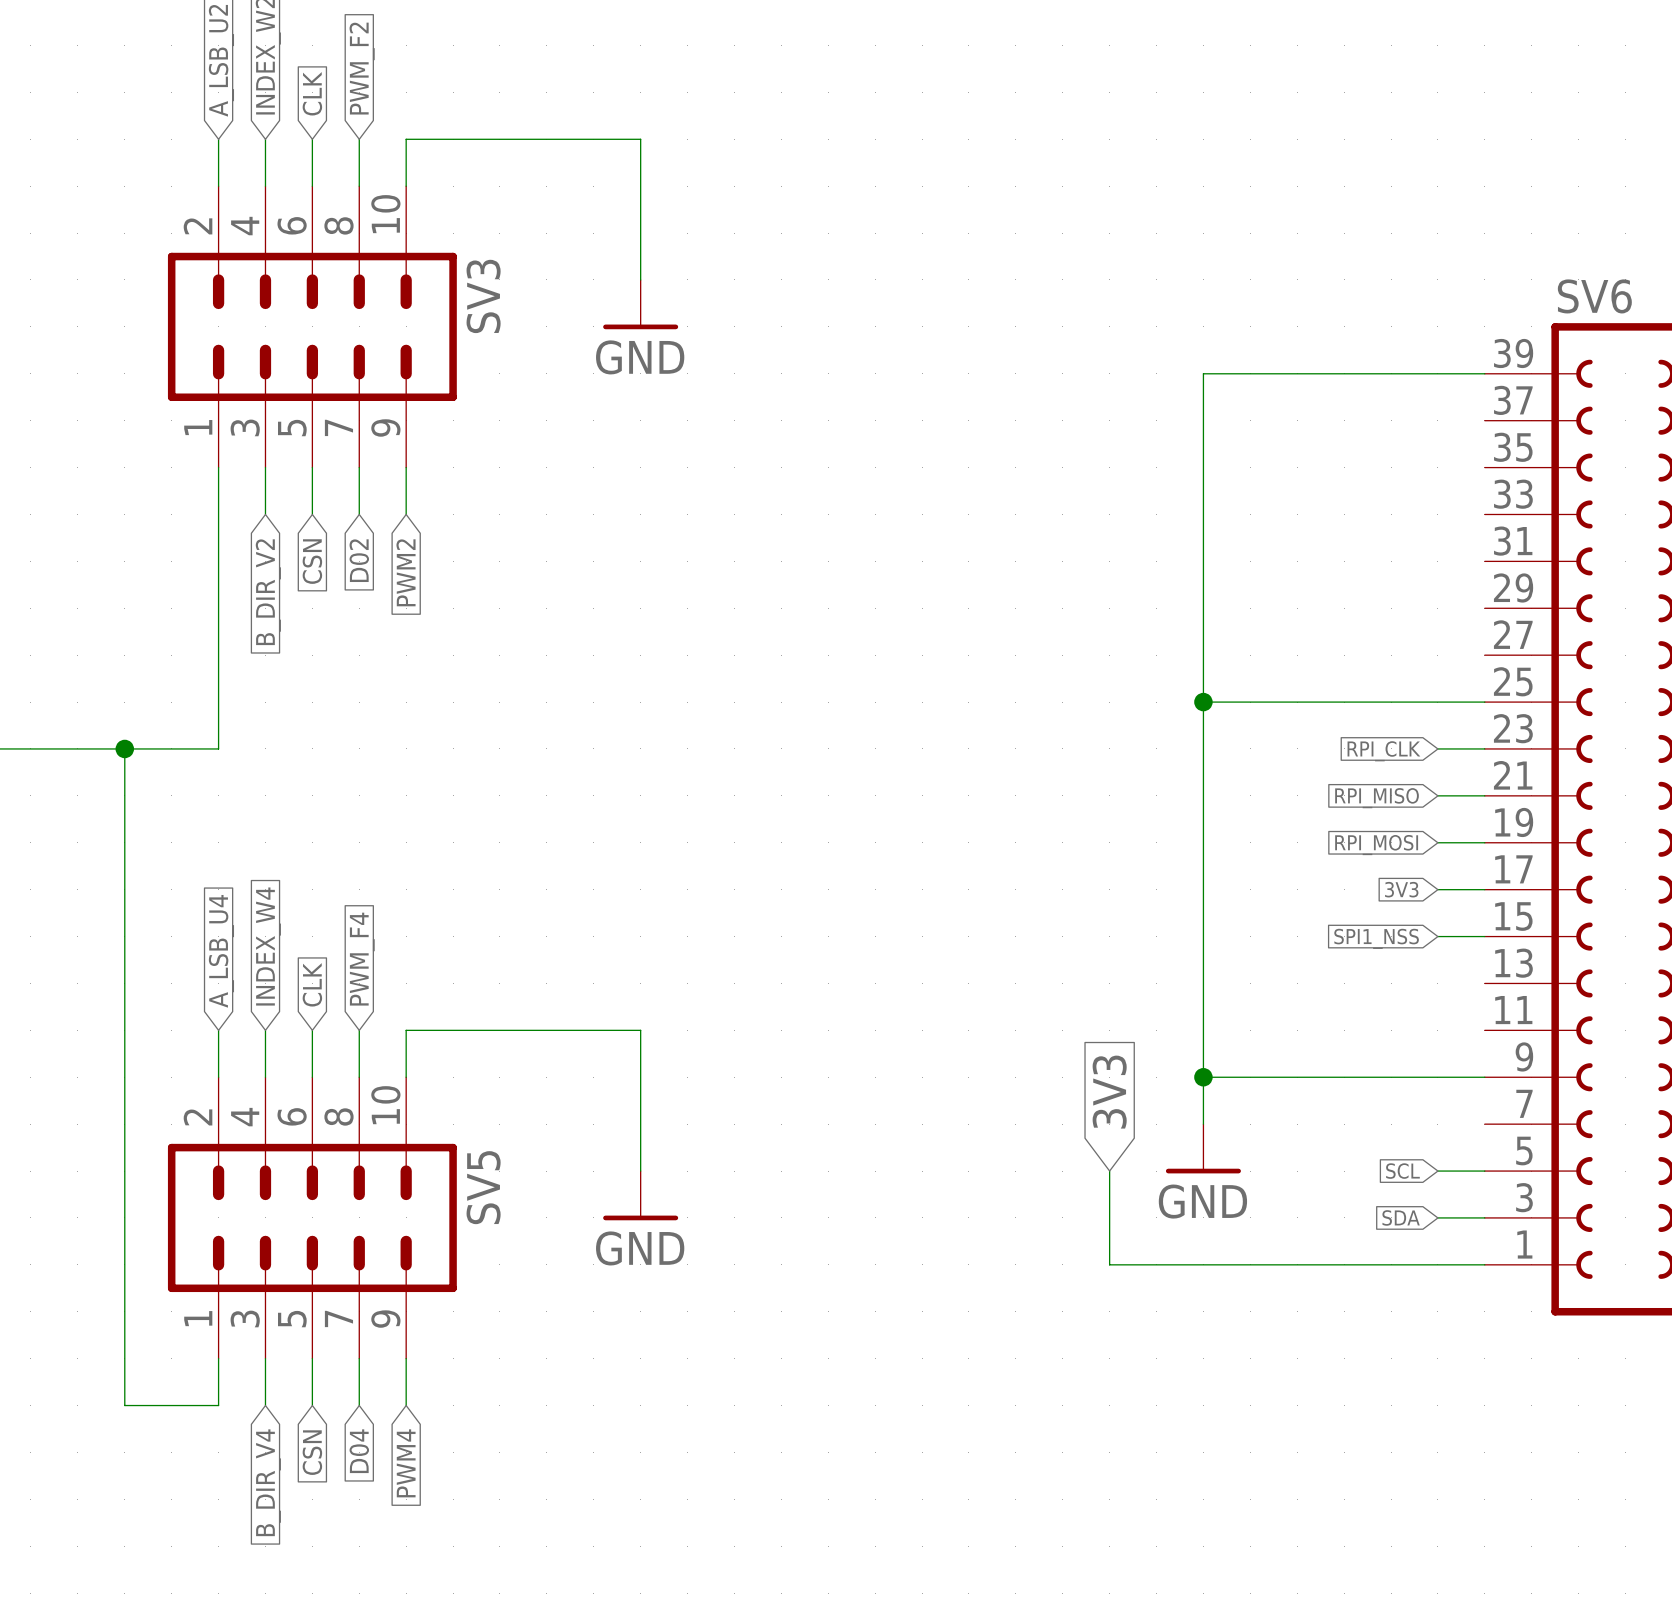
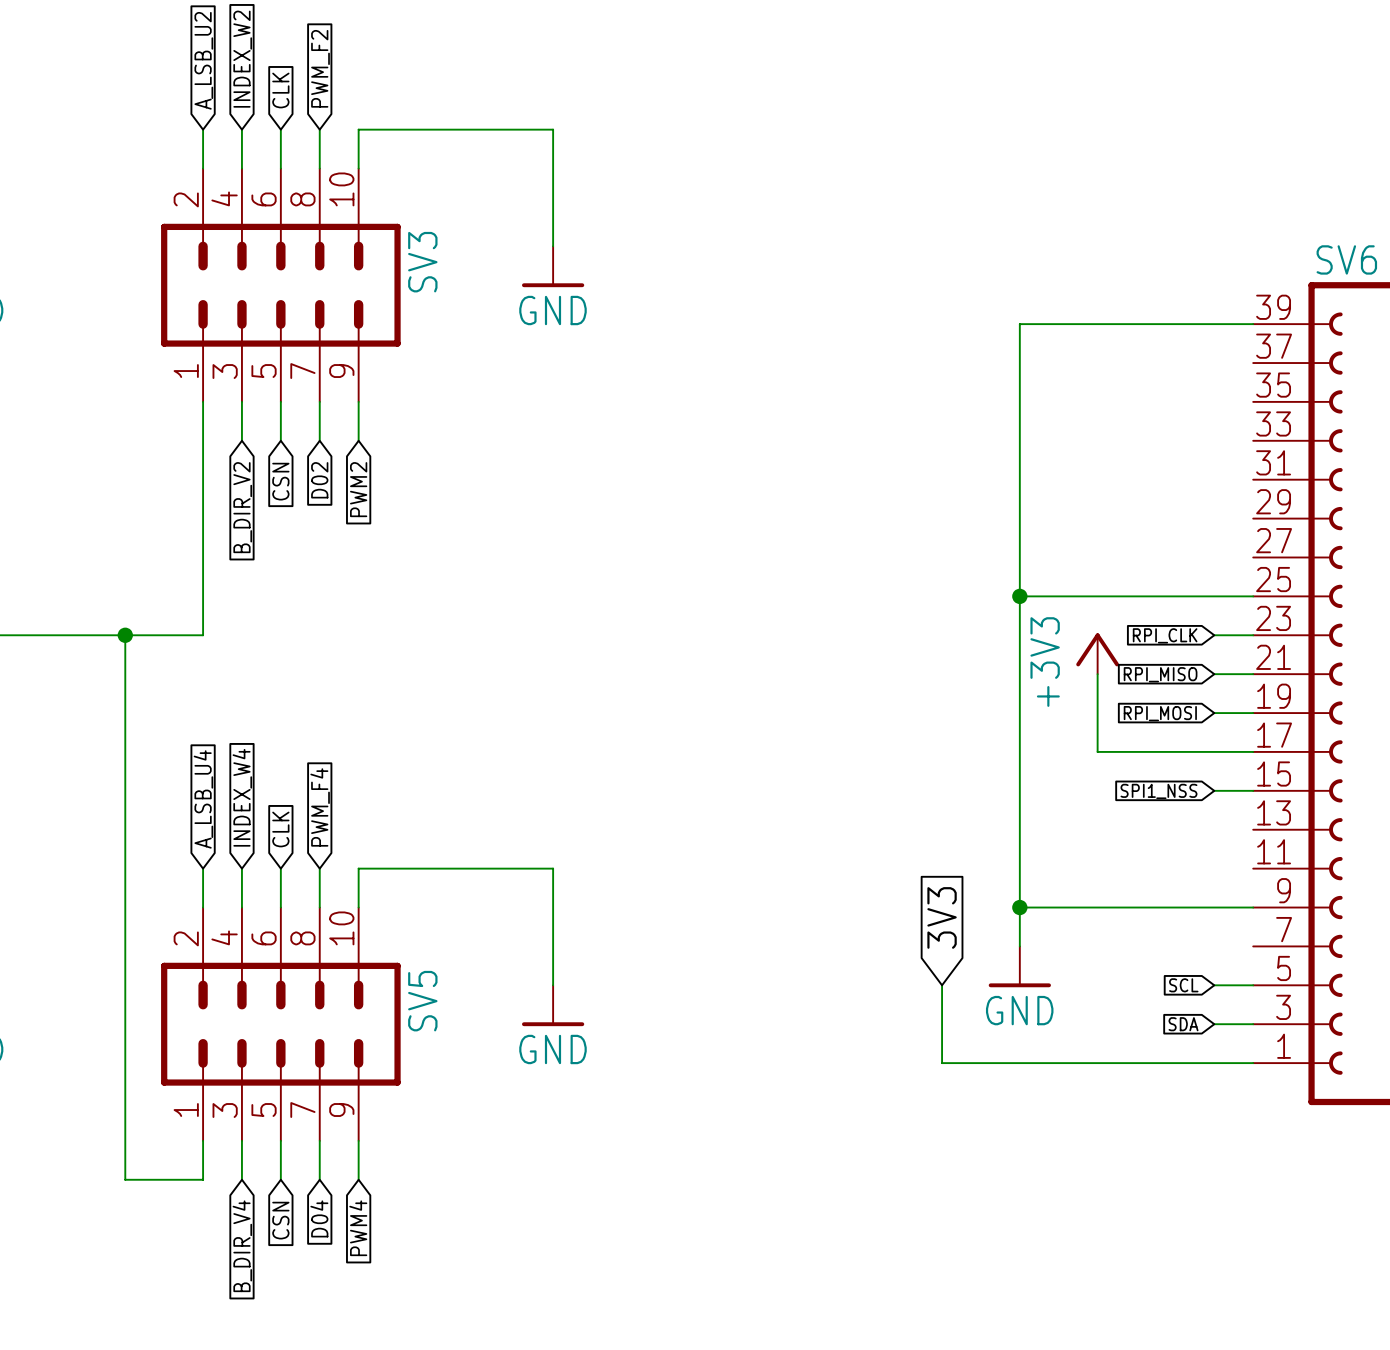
power symbol: none -> +3V3 (1097, 653)
wire: none -> (1097, 674) (1097, 751) (1214, 751)
global label: 3V3 (1401, 889) -> none

